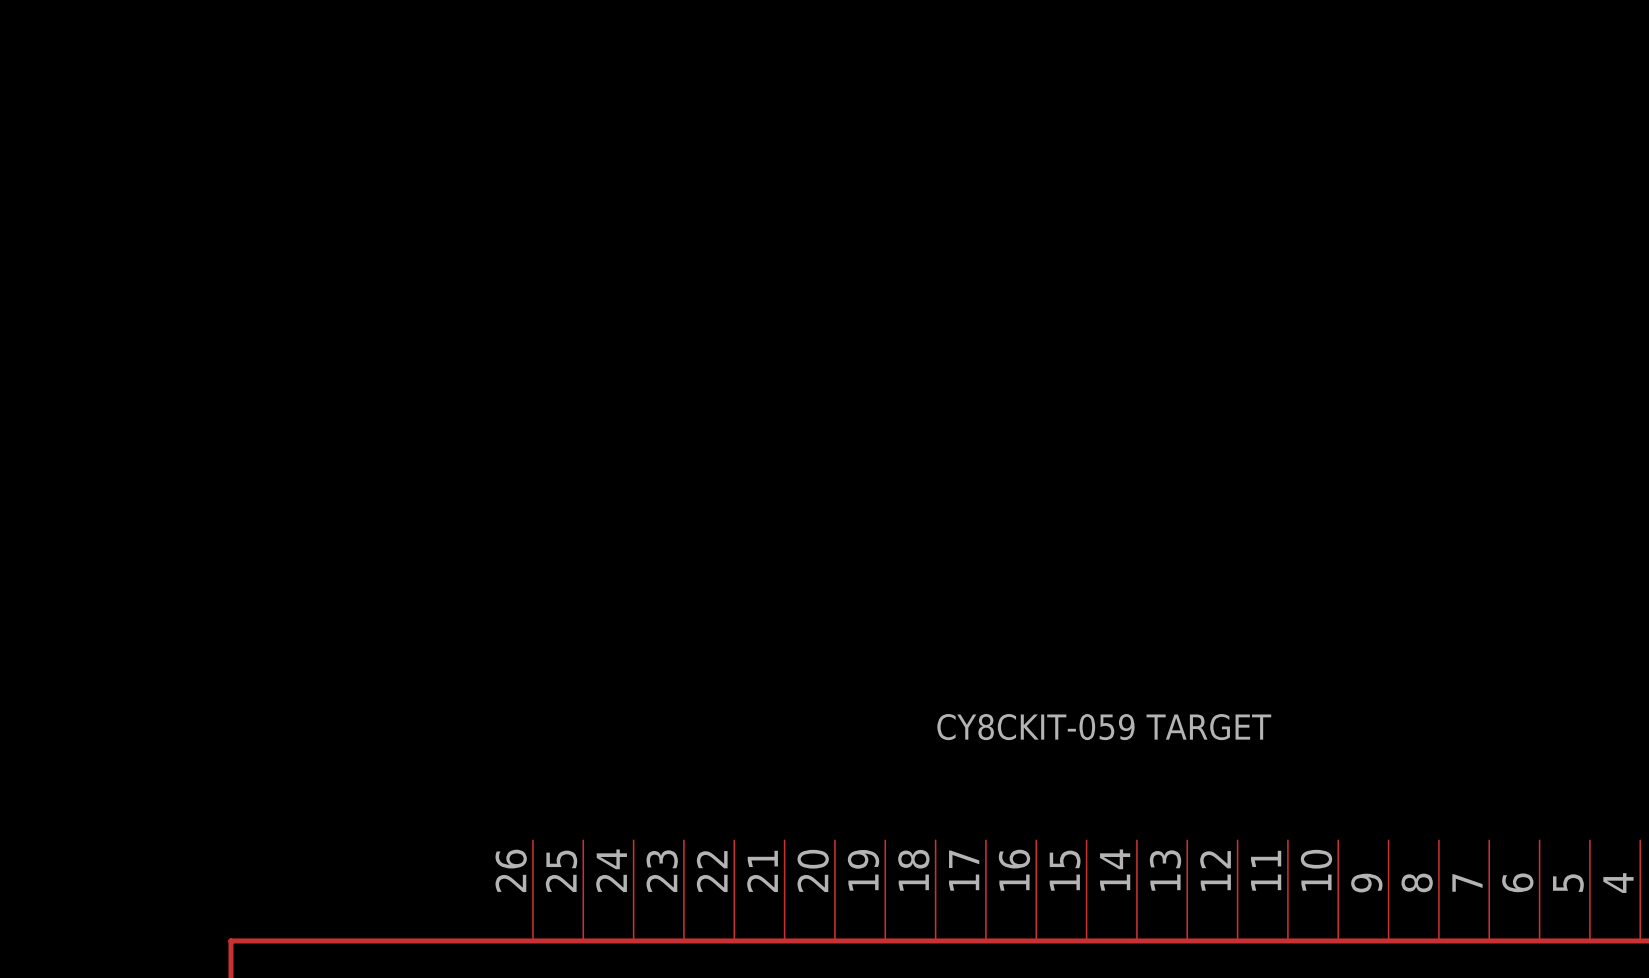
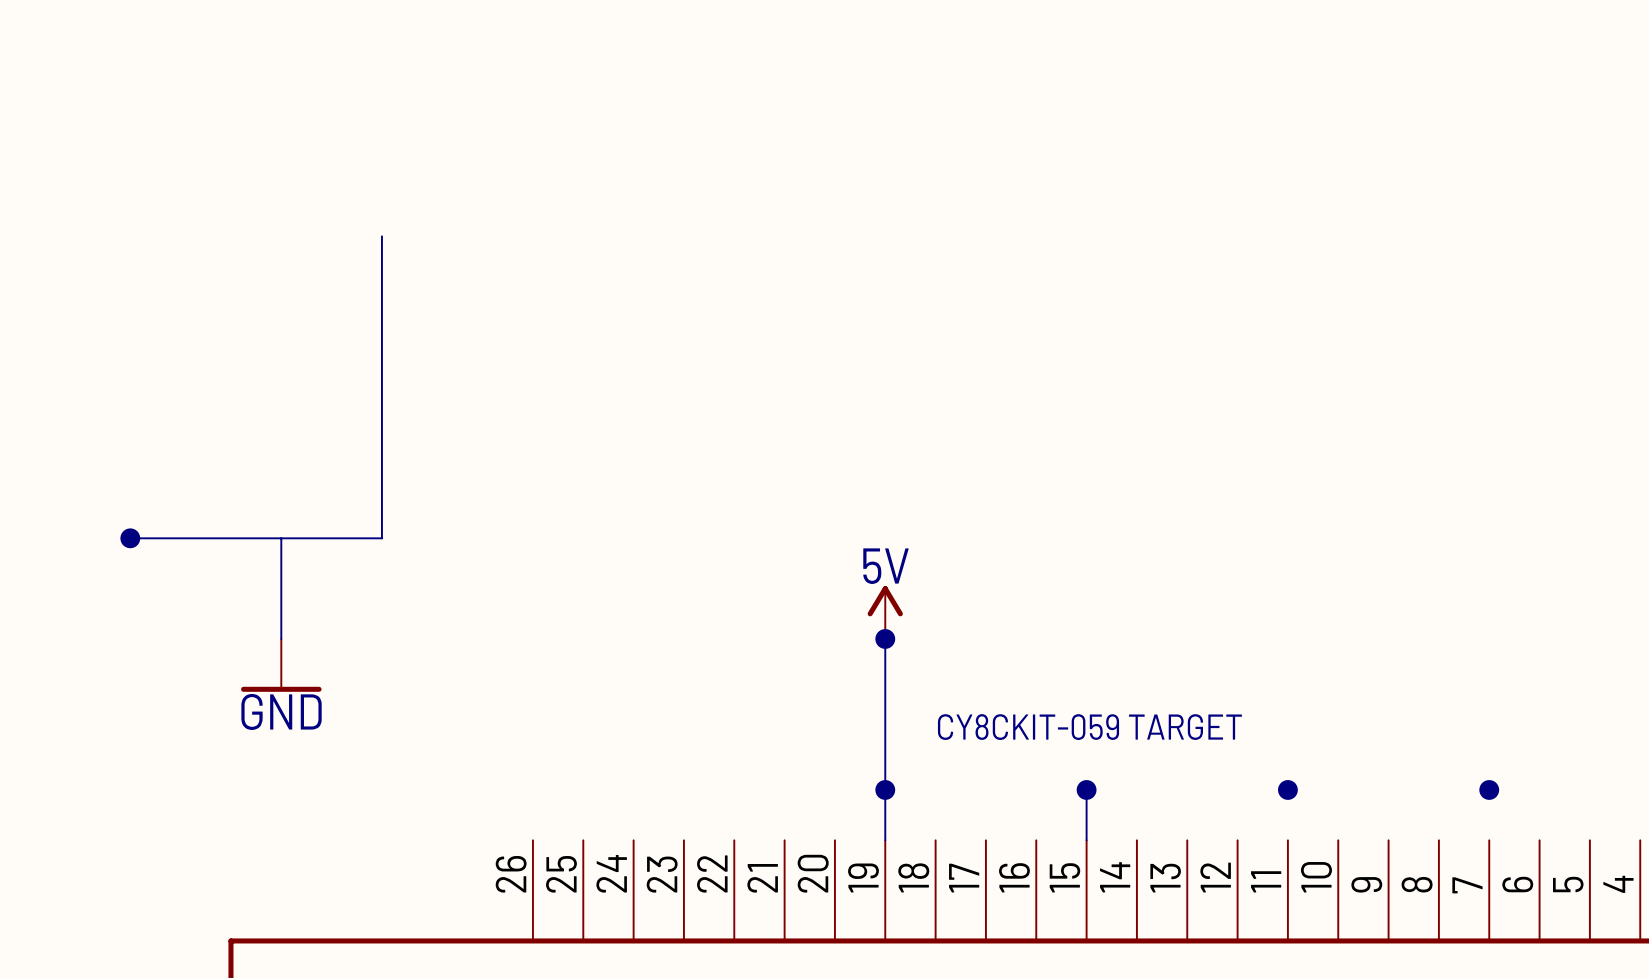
wire: none -> (381, 236) (381, 538) (130, 538)
junction: none -> (130, 538)
wire: none -> (281, 538) (281, 638)
power symbol: none -> 5V (885, 612)
wire: none -> (885, 638) (885, 840)
junction: none -> (885, 638)
power symbol: none -> GND (281, 665)
junction: none -> (885, 789)
wire: none -> (1086, 789) (1086, 840)
junction: none -> (1086, 789)
junction: none -> (1287, 789)
junction: none -> (1489, 789)

